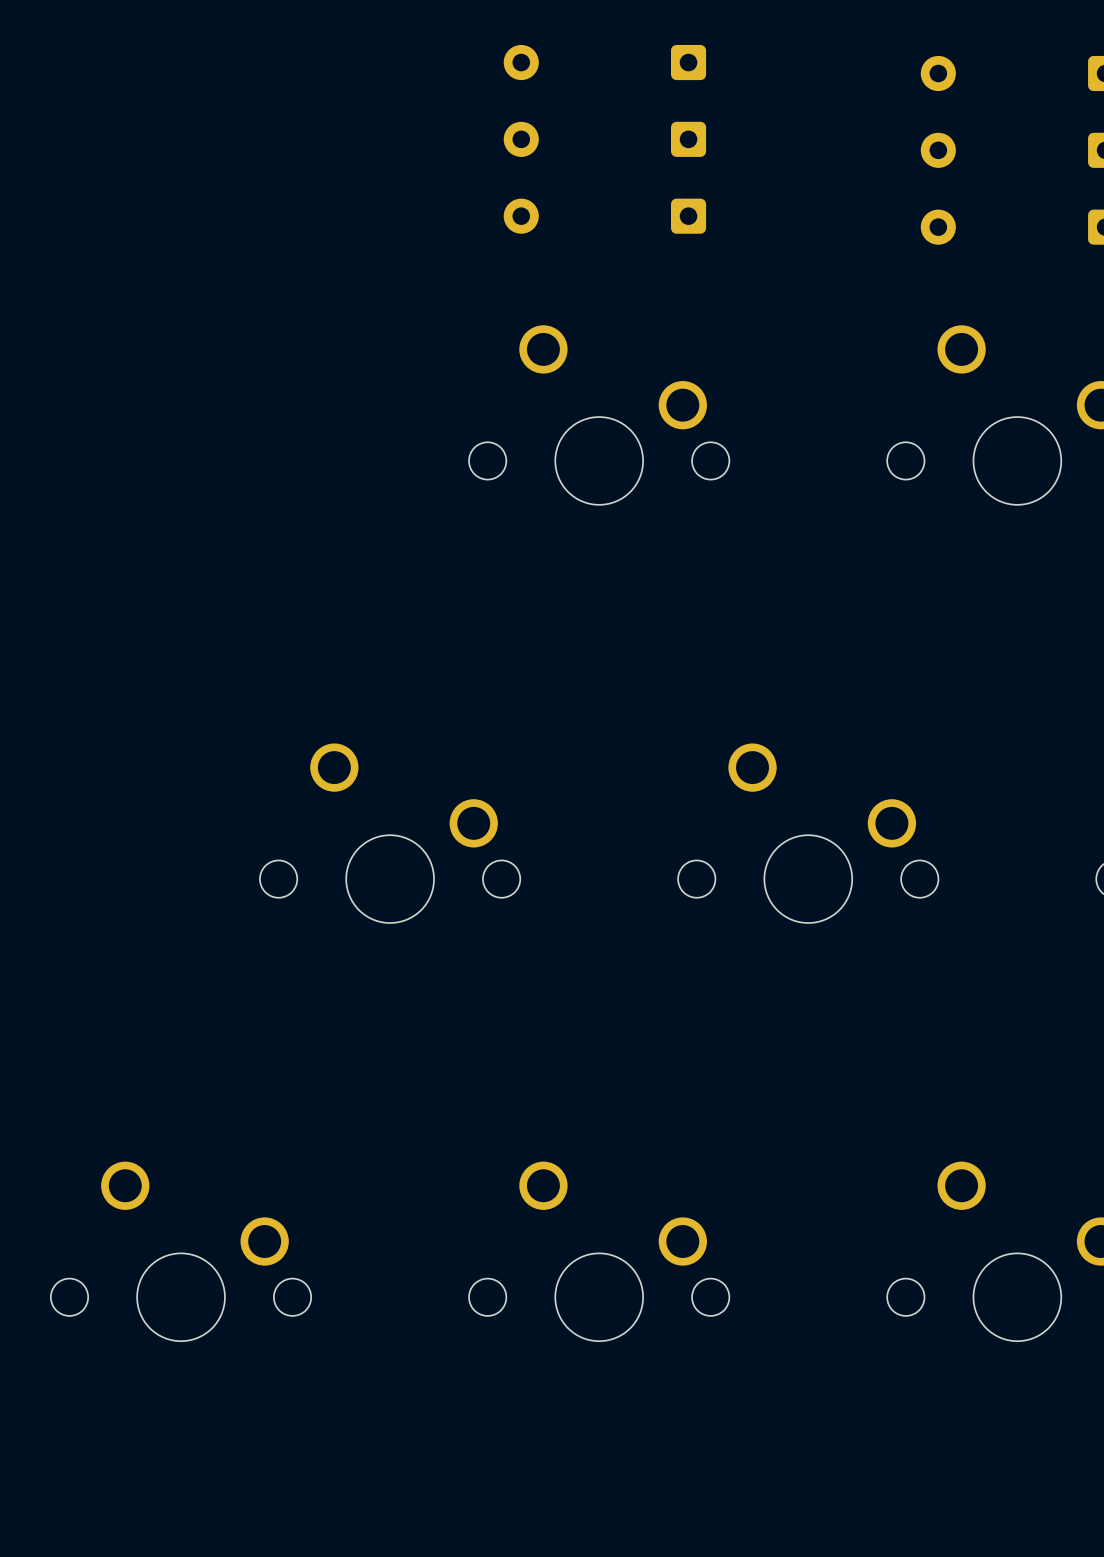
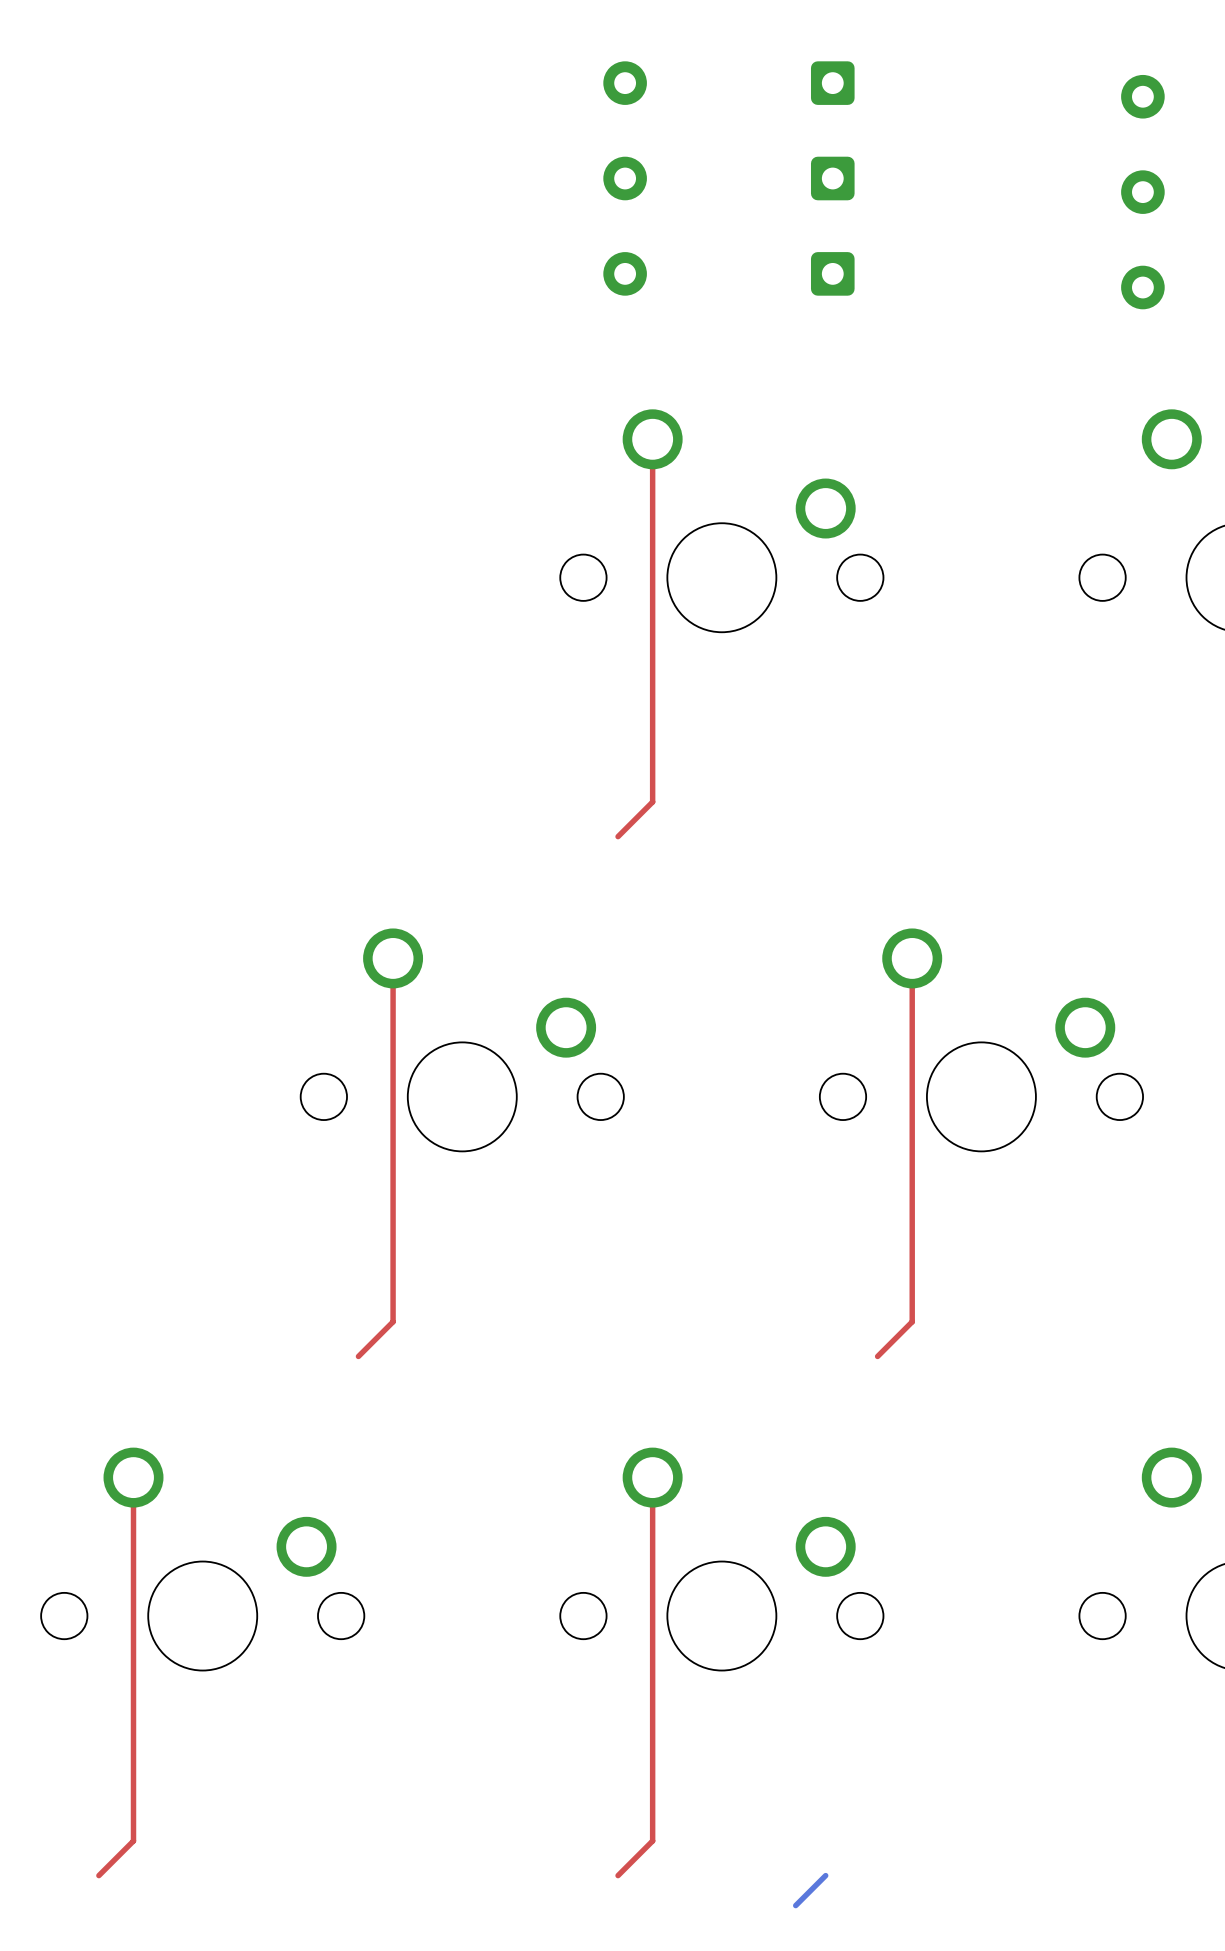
top track: none -> (652, 439) (652, 802) (618, 836)
top track: none -> (393, 958) (393, 1321) (358, 1356)
top track: none -> (912, 958) (912, 1321) (877, 1356)
top track: none -> (133, 1477) (133, 1840) (98, 1875)
top track: none -> (652, 1477) (652, 1840) (618, 1875)
bottom track: none -> (825, 1875) (795, 1905)

